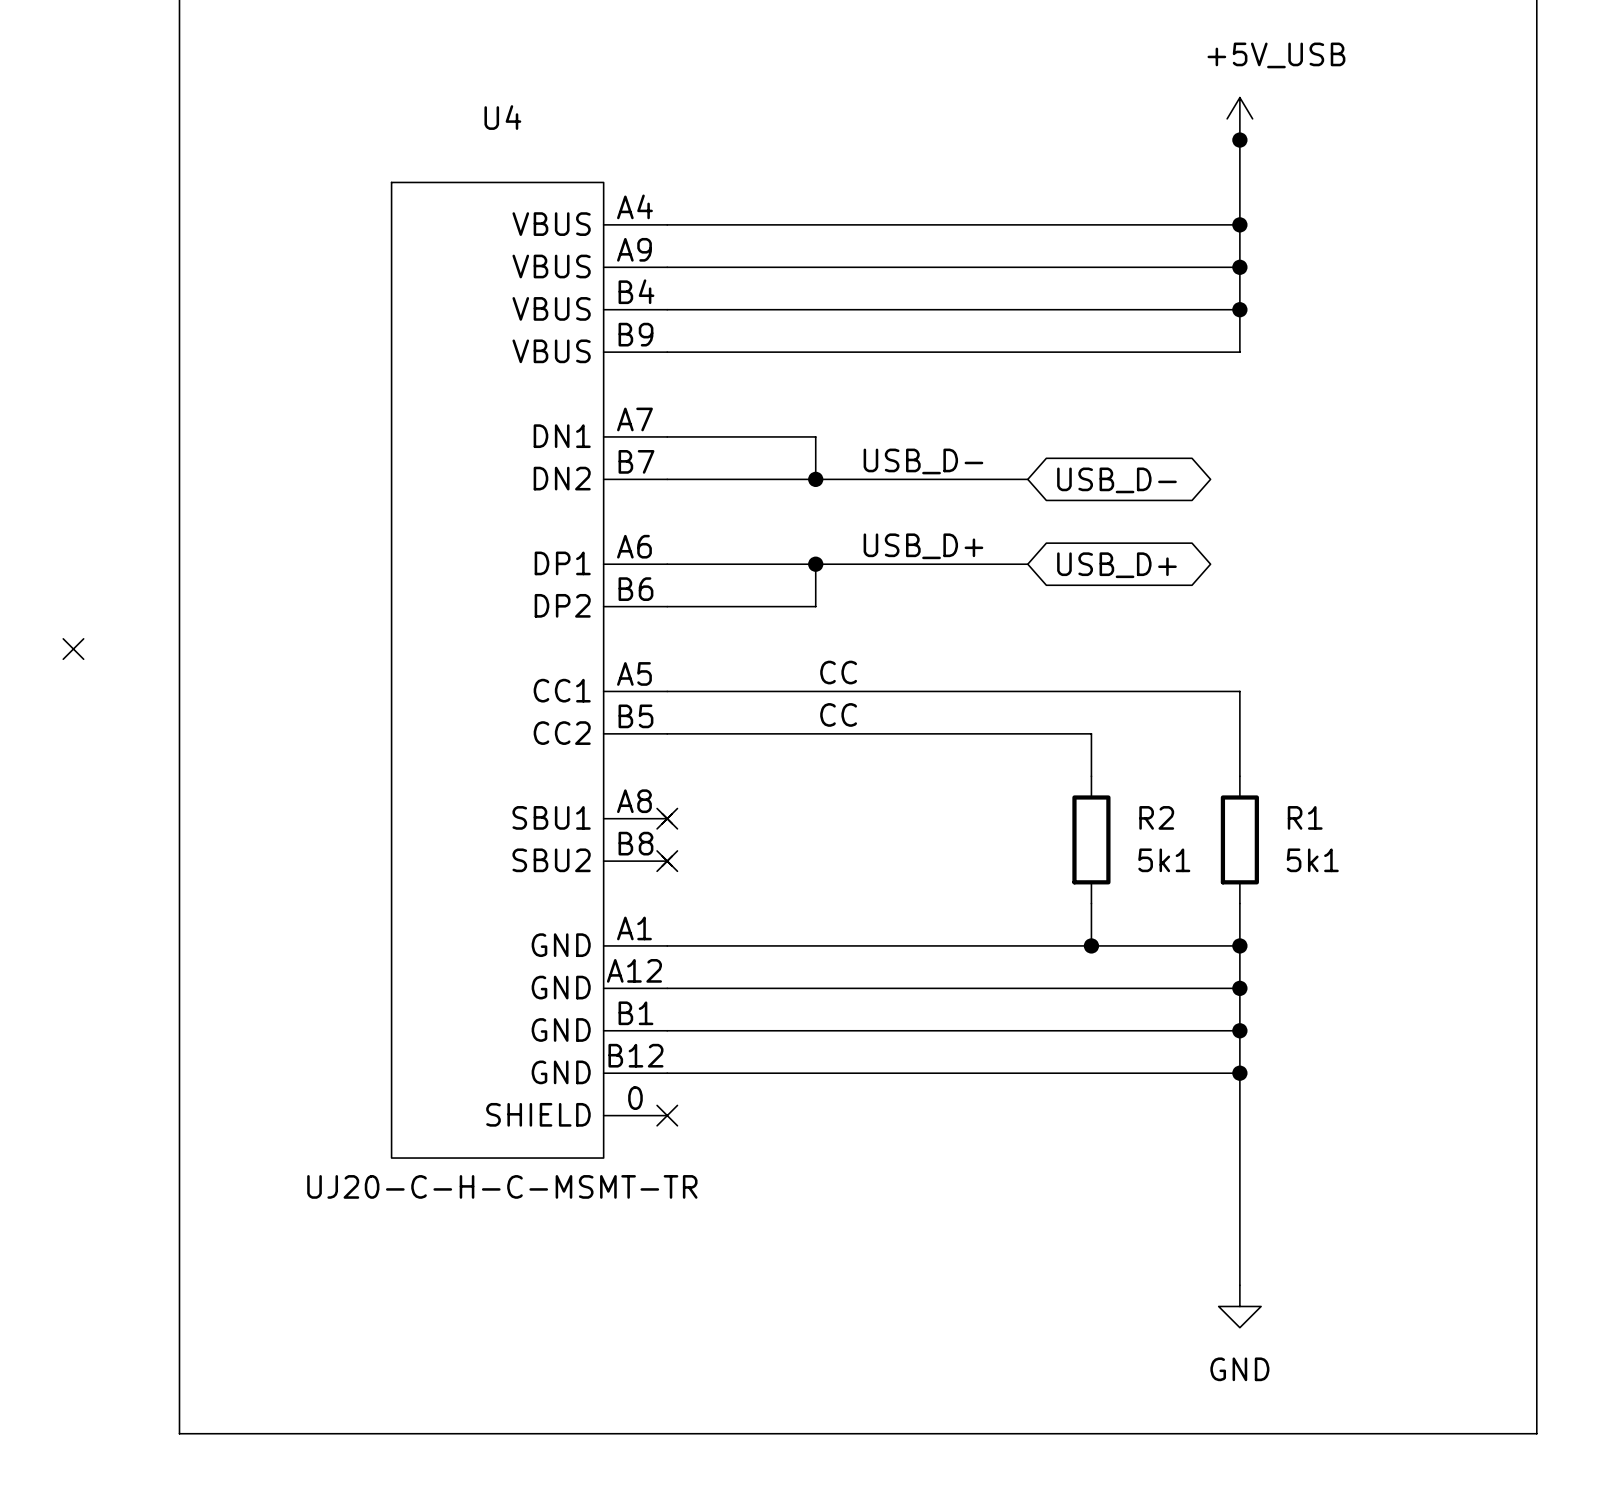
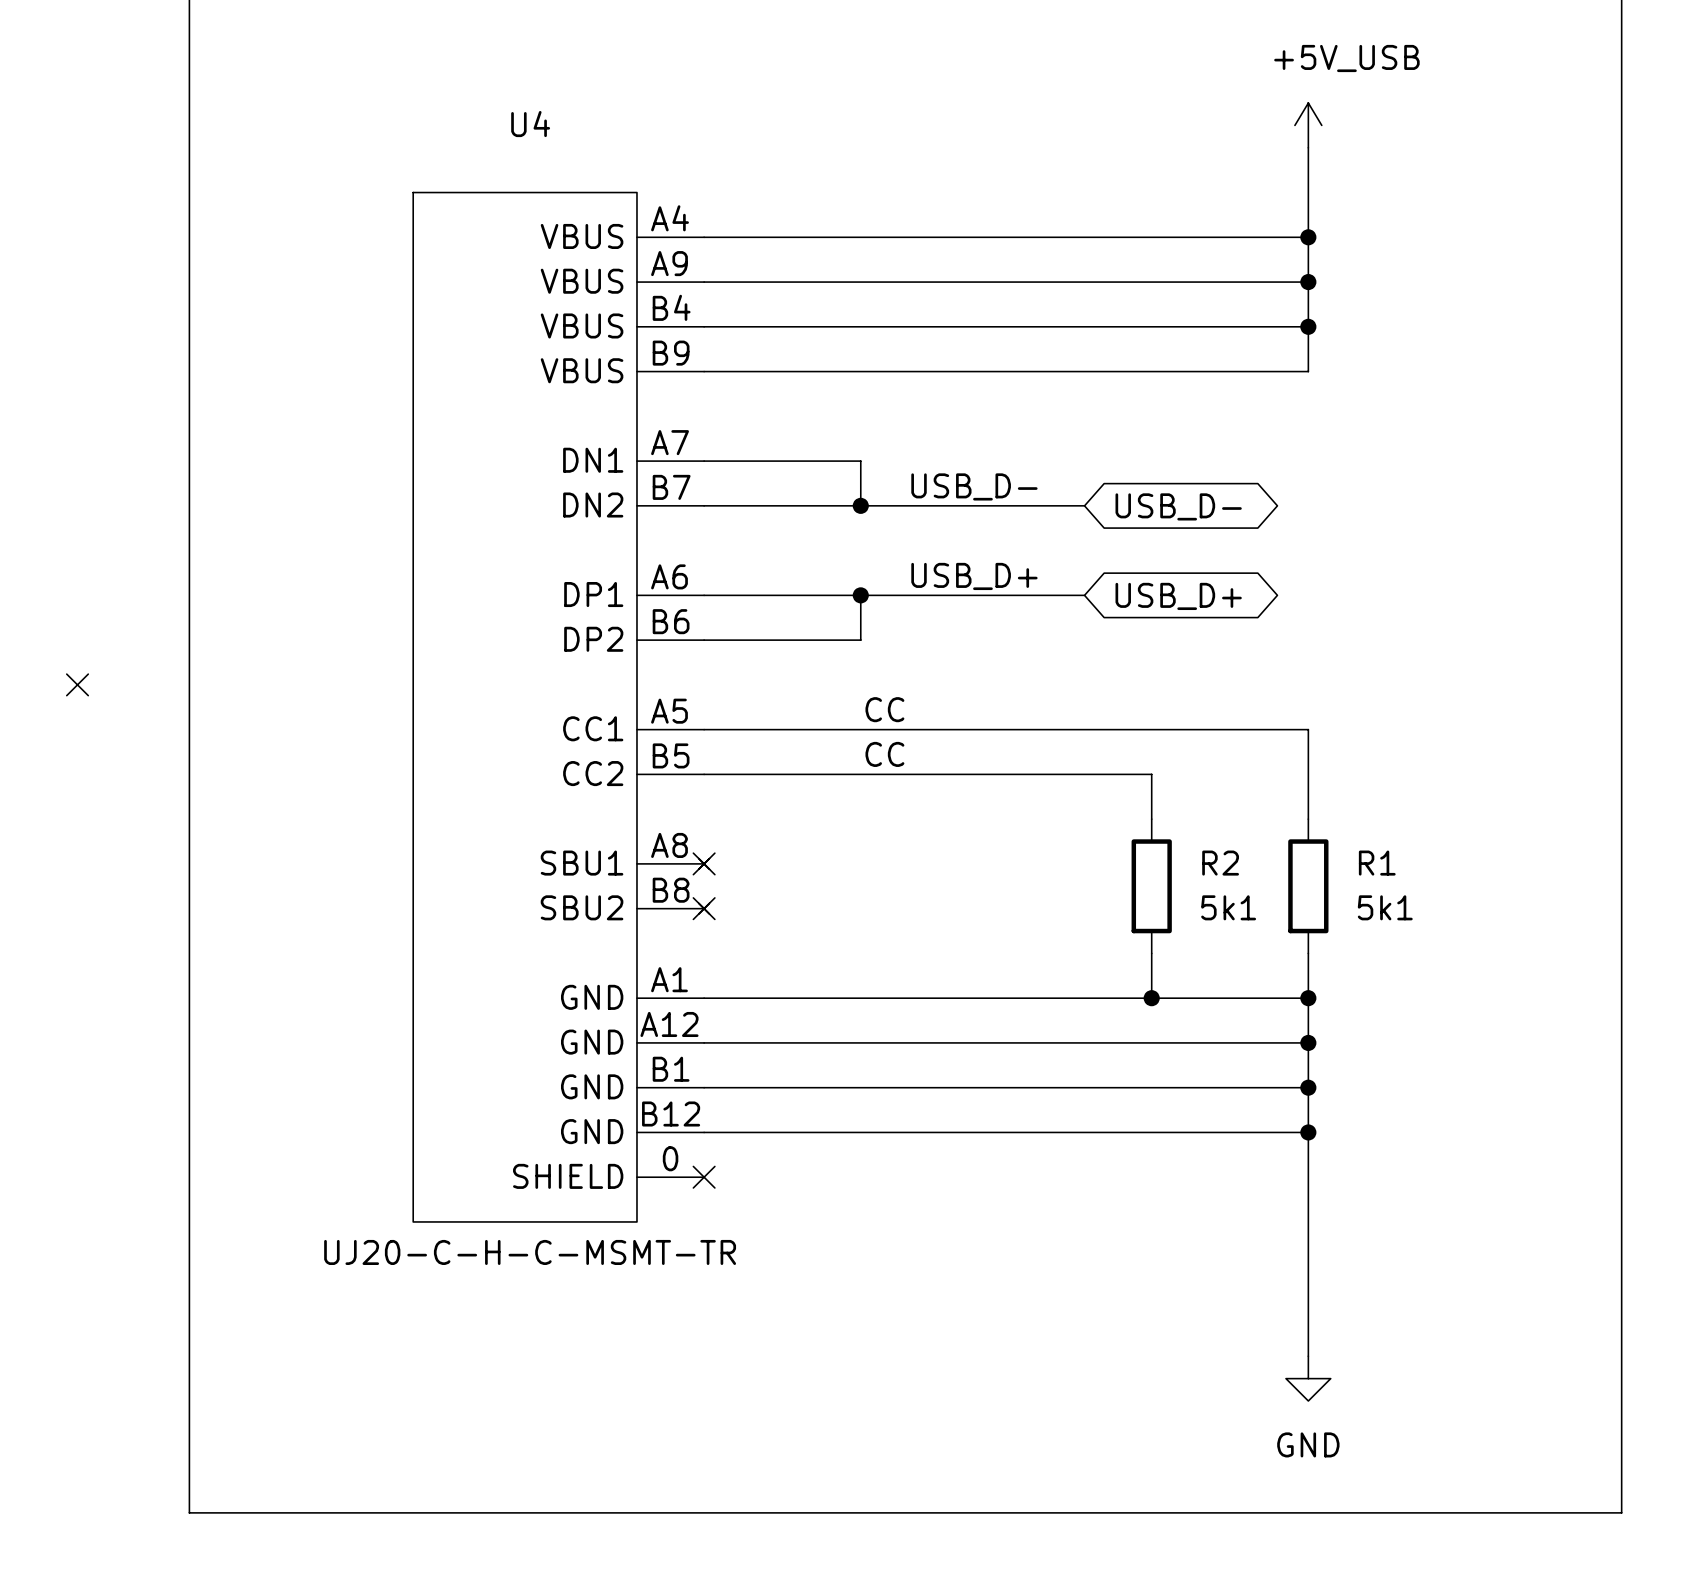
junction: (1239, 140) -> none

